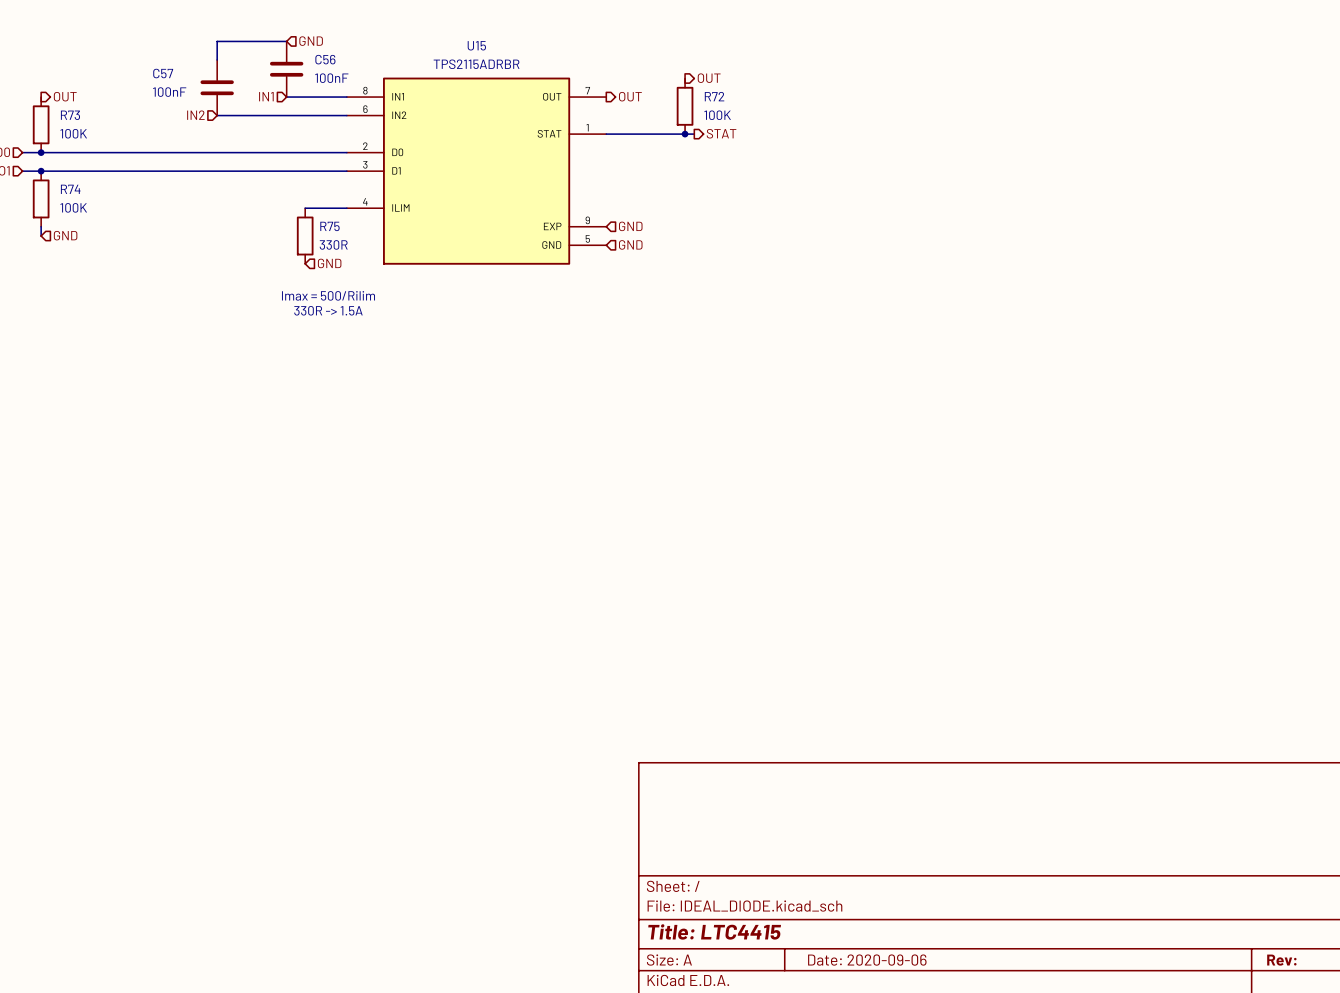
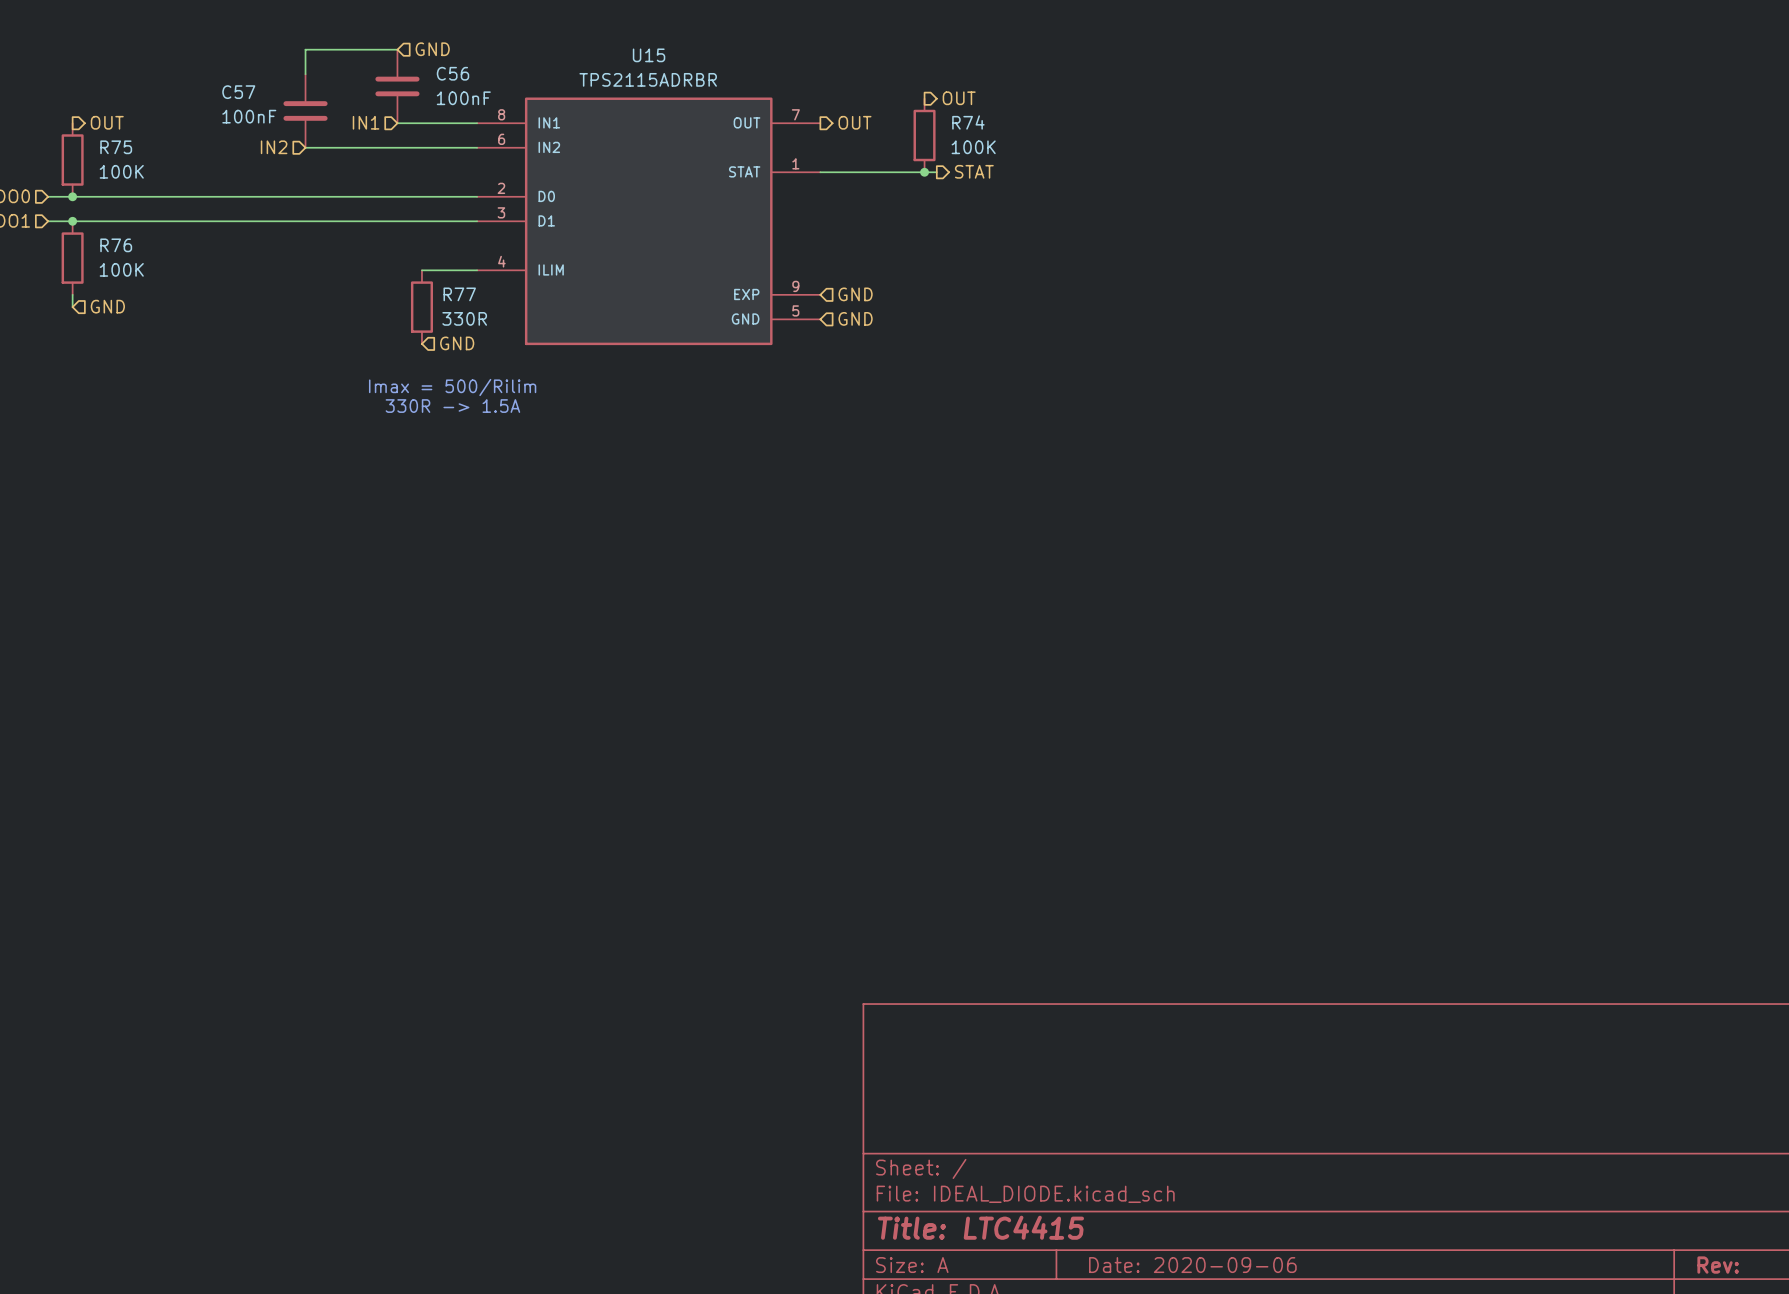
R72 name: R72 (714, 96) -> R74 (968, 122)
R73 name: R73 (70, 115) -> R75 (116, 147)
R74 name: R74 (70, 189) -> R76 (116, 245)
R75 name: R75 (329, 226) -> R77 (459, 294)

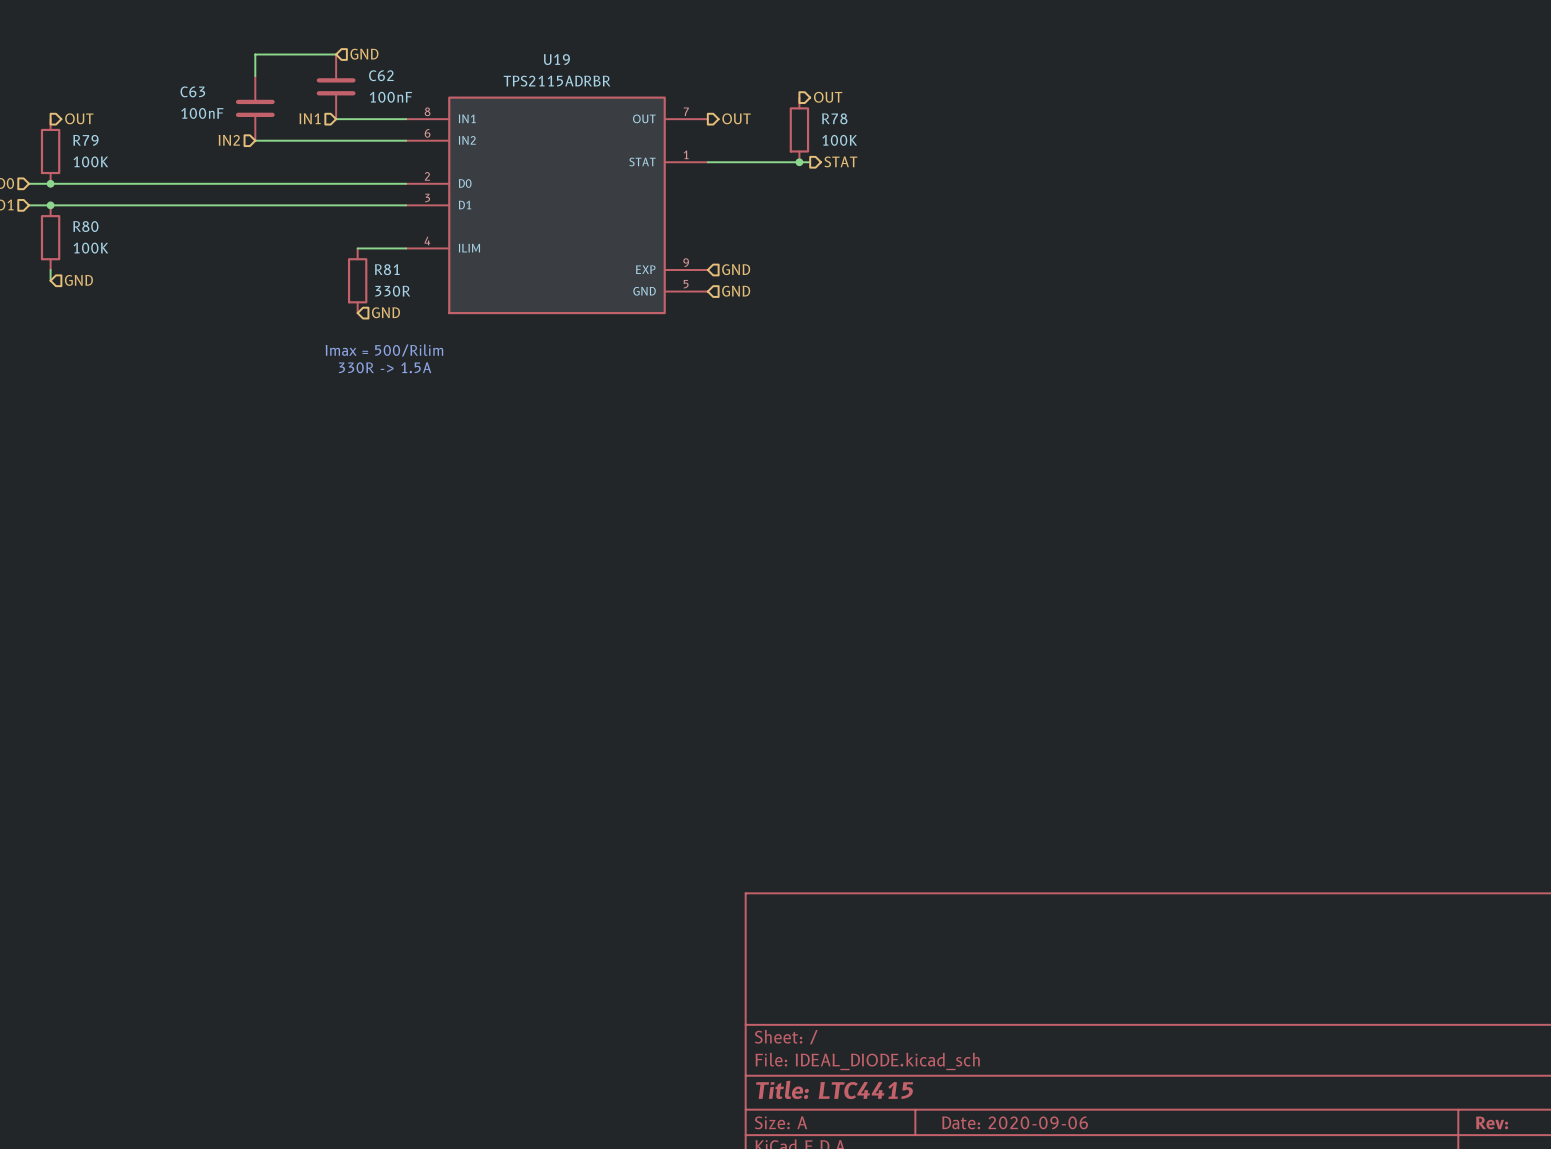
U15 name: U15 (649, 55) -> U19 (556, 59)
C56 name: C56 (453, 73) -> C62 (381, 75)
C57 name: C57 (238, 92) -> C63 (192, 91)
R74 name: R74 (968, 122) -> R78 (834, 118)
R75 name: R75 (116, 147) -> R79 (85, 140)
R76 name: R76 (116, 245) -> R80 (85, 226)
R77 name: R77 (459, 294) -> R81 (387, 269)

